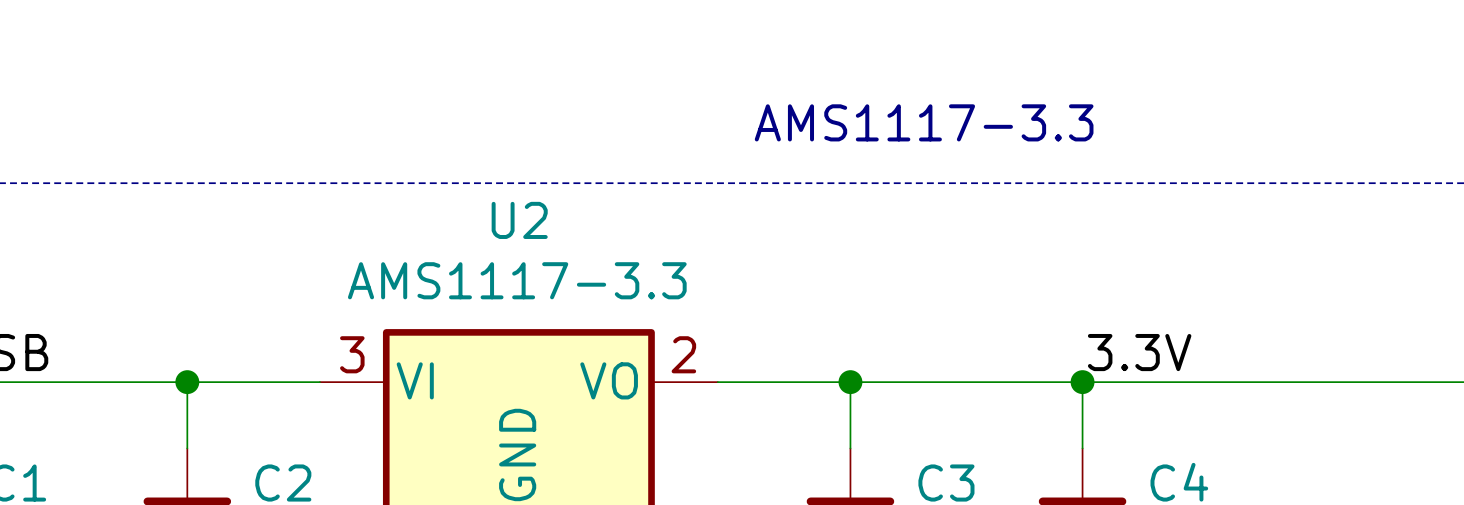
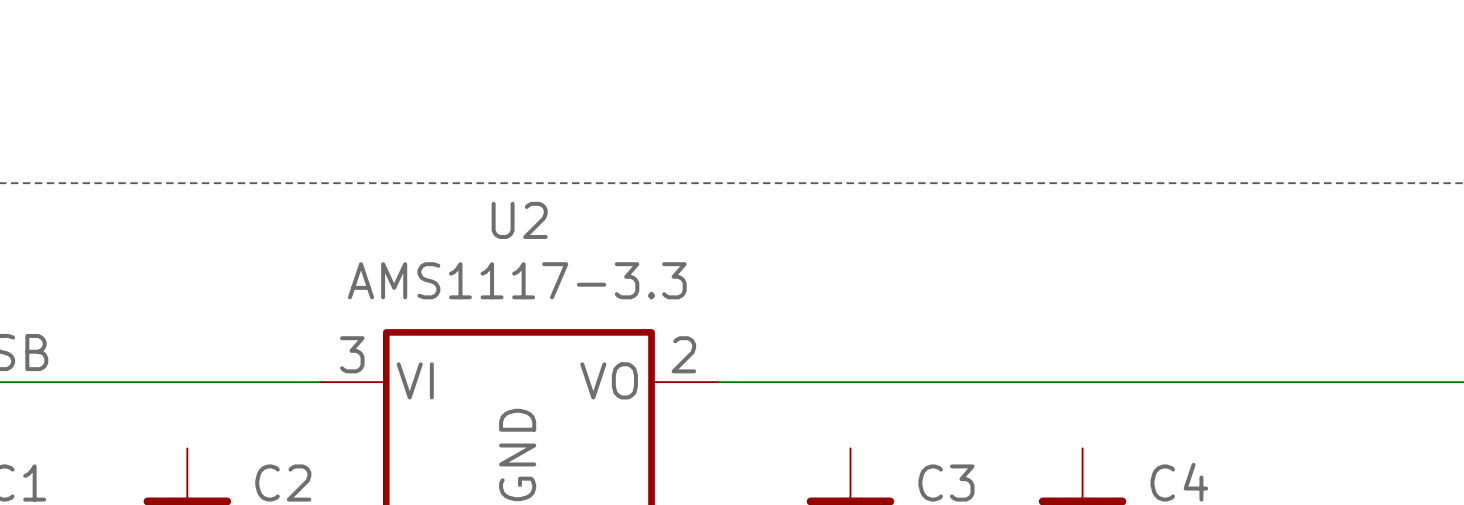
text: AMS1117-3.3 (924, 122) -> none
label: 3.3V (1139, 352) -> none
wire: (187, 382) (187, 448) -> none
junction: (187, 382) -> none
wire: (850, 382) (850, 448) -> none
junction: (850, 382) -> none
wire: (1082, 382) (1082, 448) -> none
junction: (1082, 382) -> none

